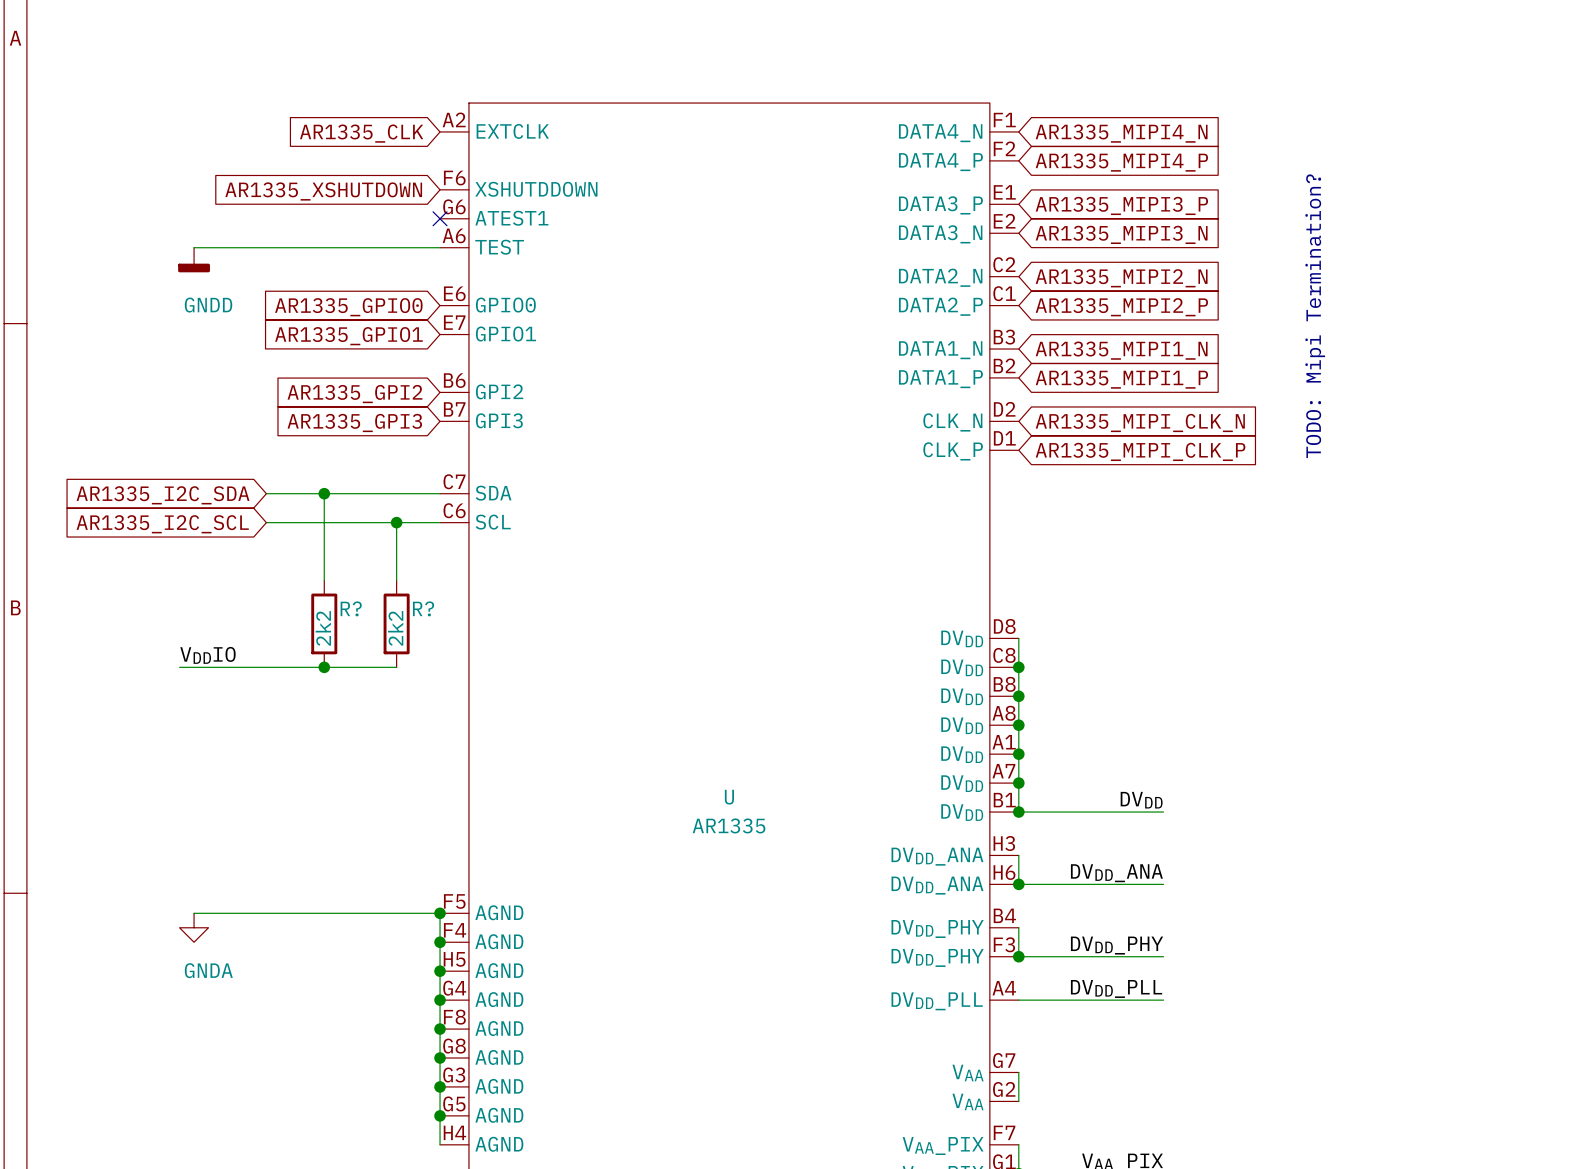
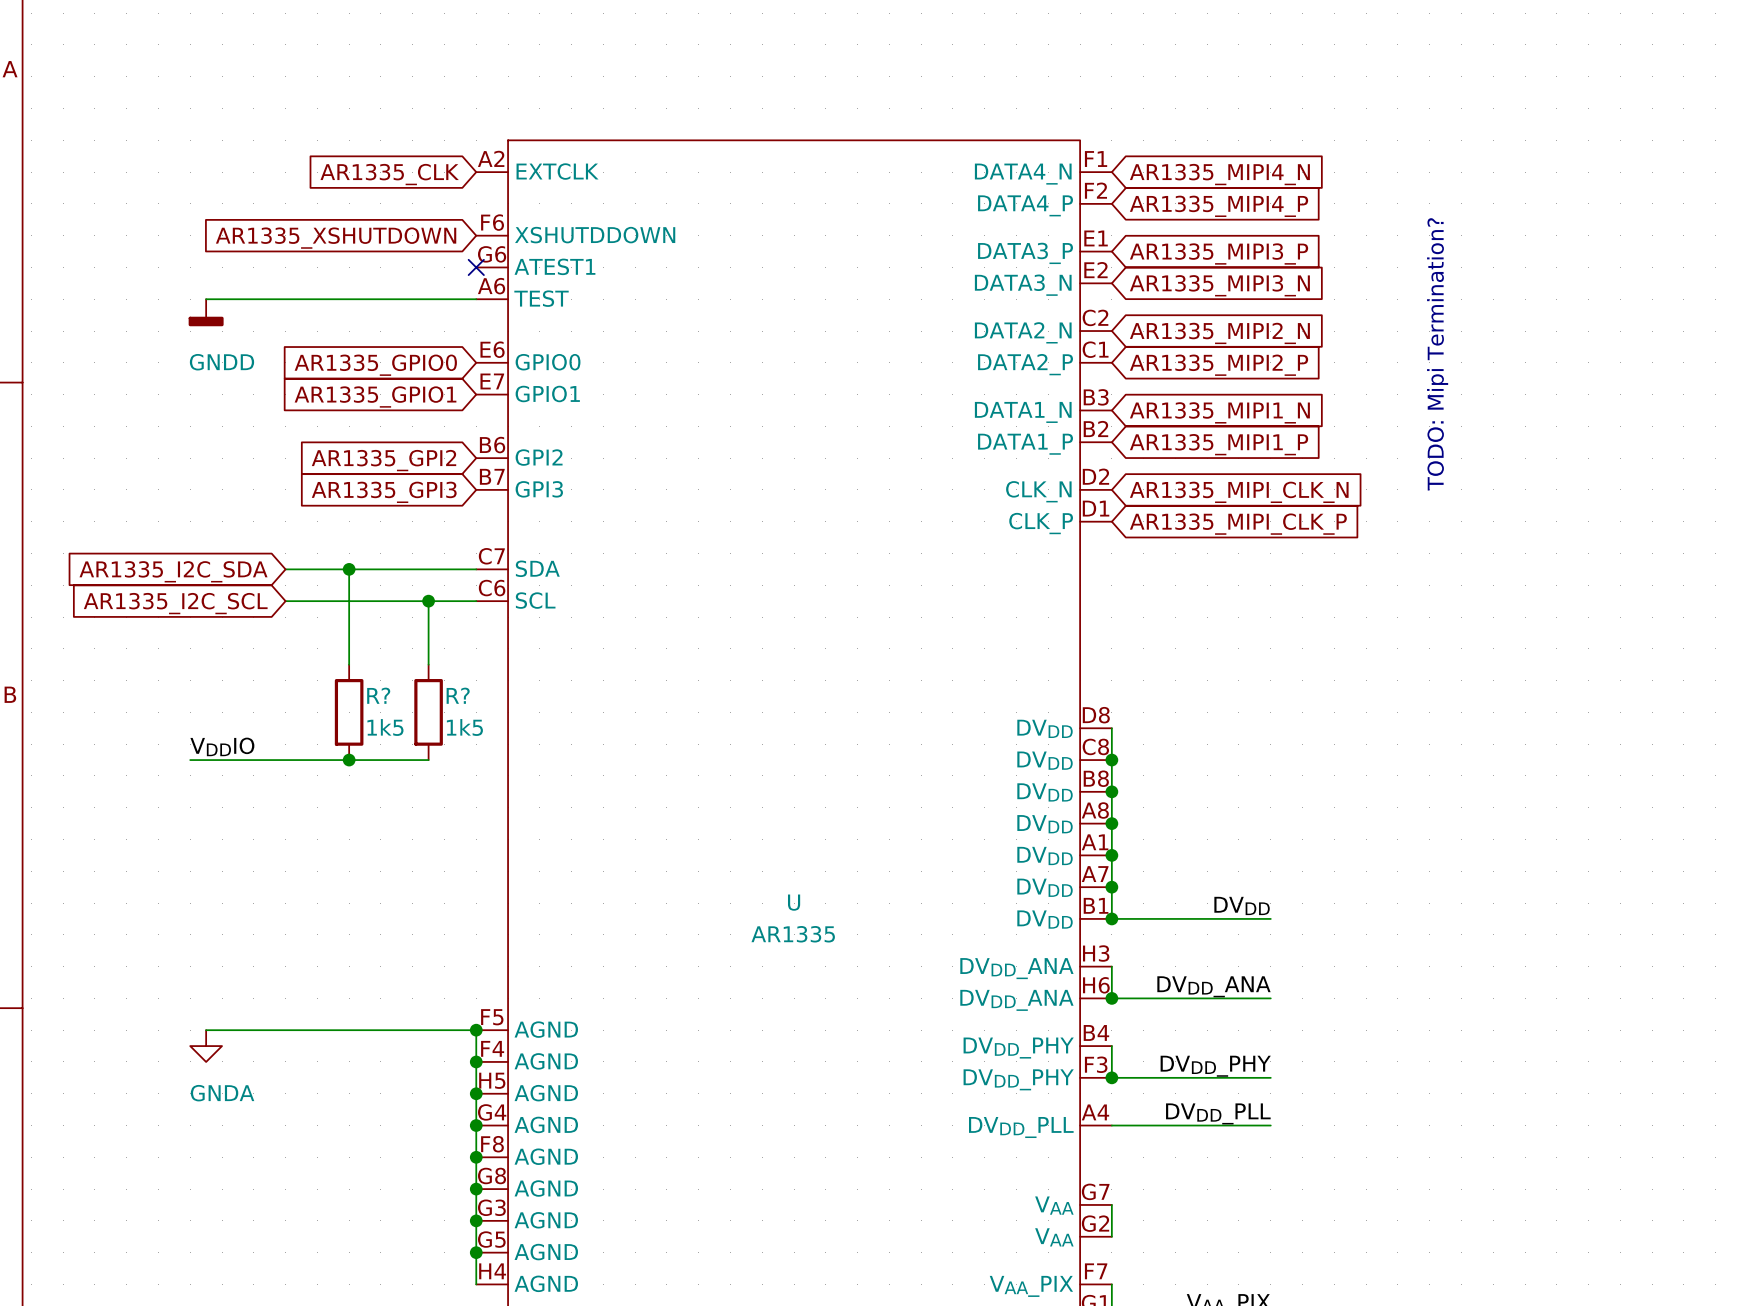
R? value: 2k2 (323, 628) -> 1k5 (385, 727)
R? value: 2k2 (395, 628) -> 1k5 (464, 727)

